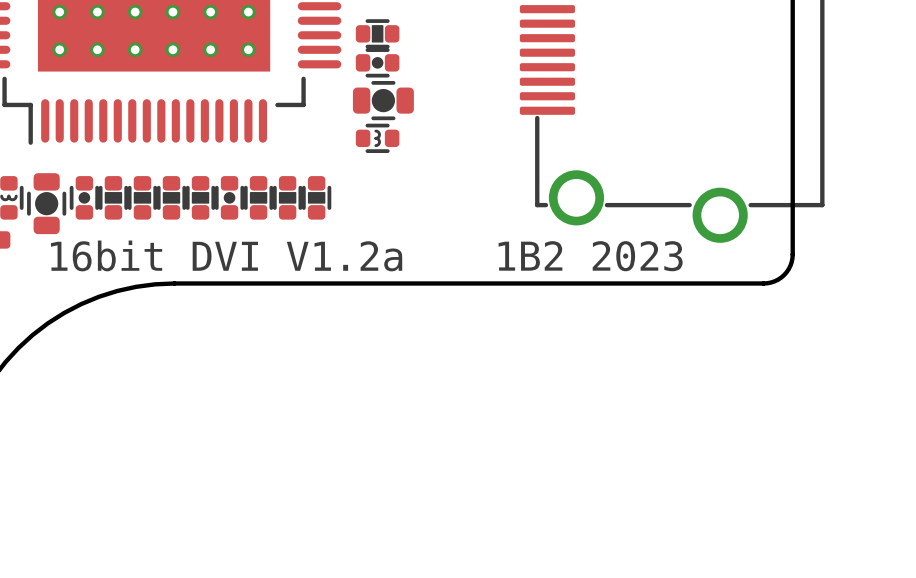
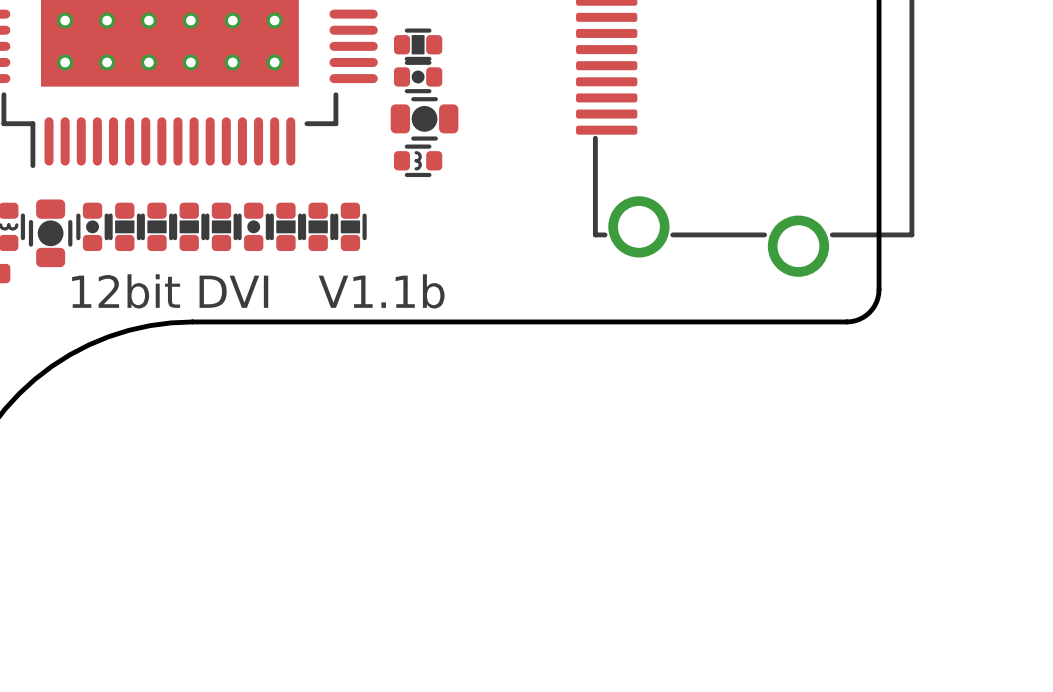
text: 16bit DVI (154, 255) -> 12bit DVI (170, 291)
text: V1.2a (344, 256) -> V1.1b (381, 291)
text: 1B2 2023 (590, 256) -> none

